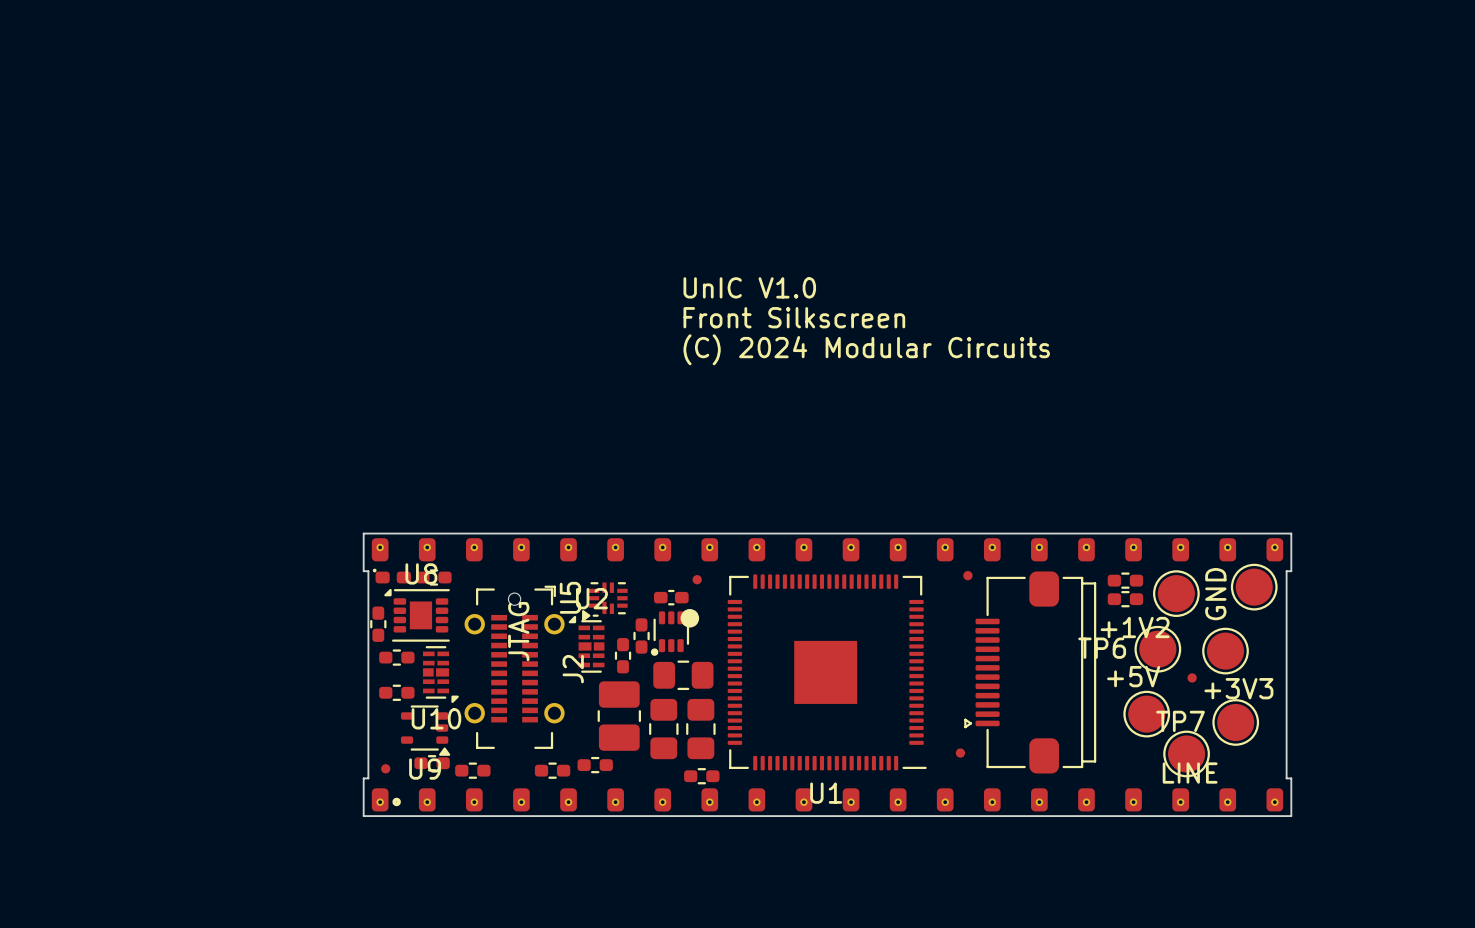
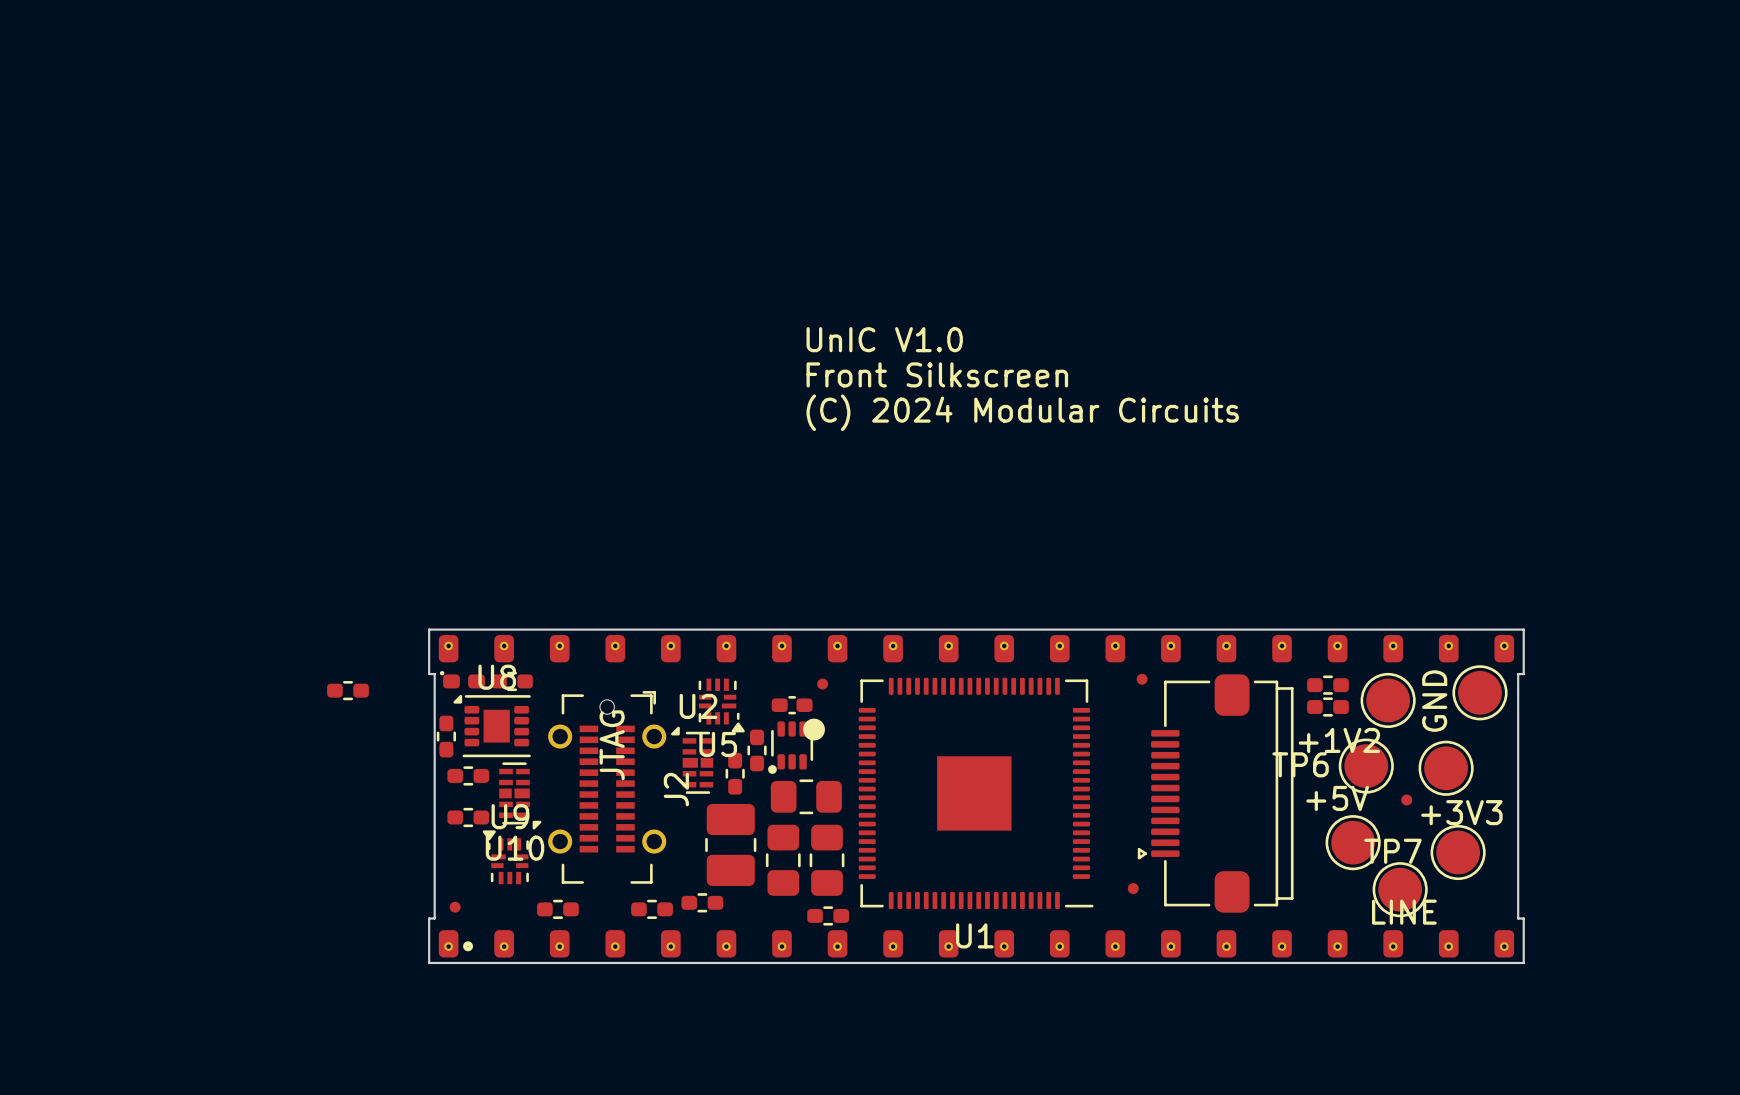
U5 rotation: 0° (604, 601) -> 90° counterclockwise (721, 705)
U9 footprint: [401, 705, 451, 756] -> [482, 830, 529, 885]
part position: (432, 763) -> (348, 690)
U9 name position: U9 (425, 769) -> U9 (510, 816)

